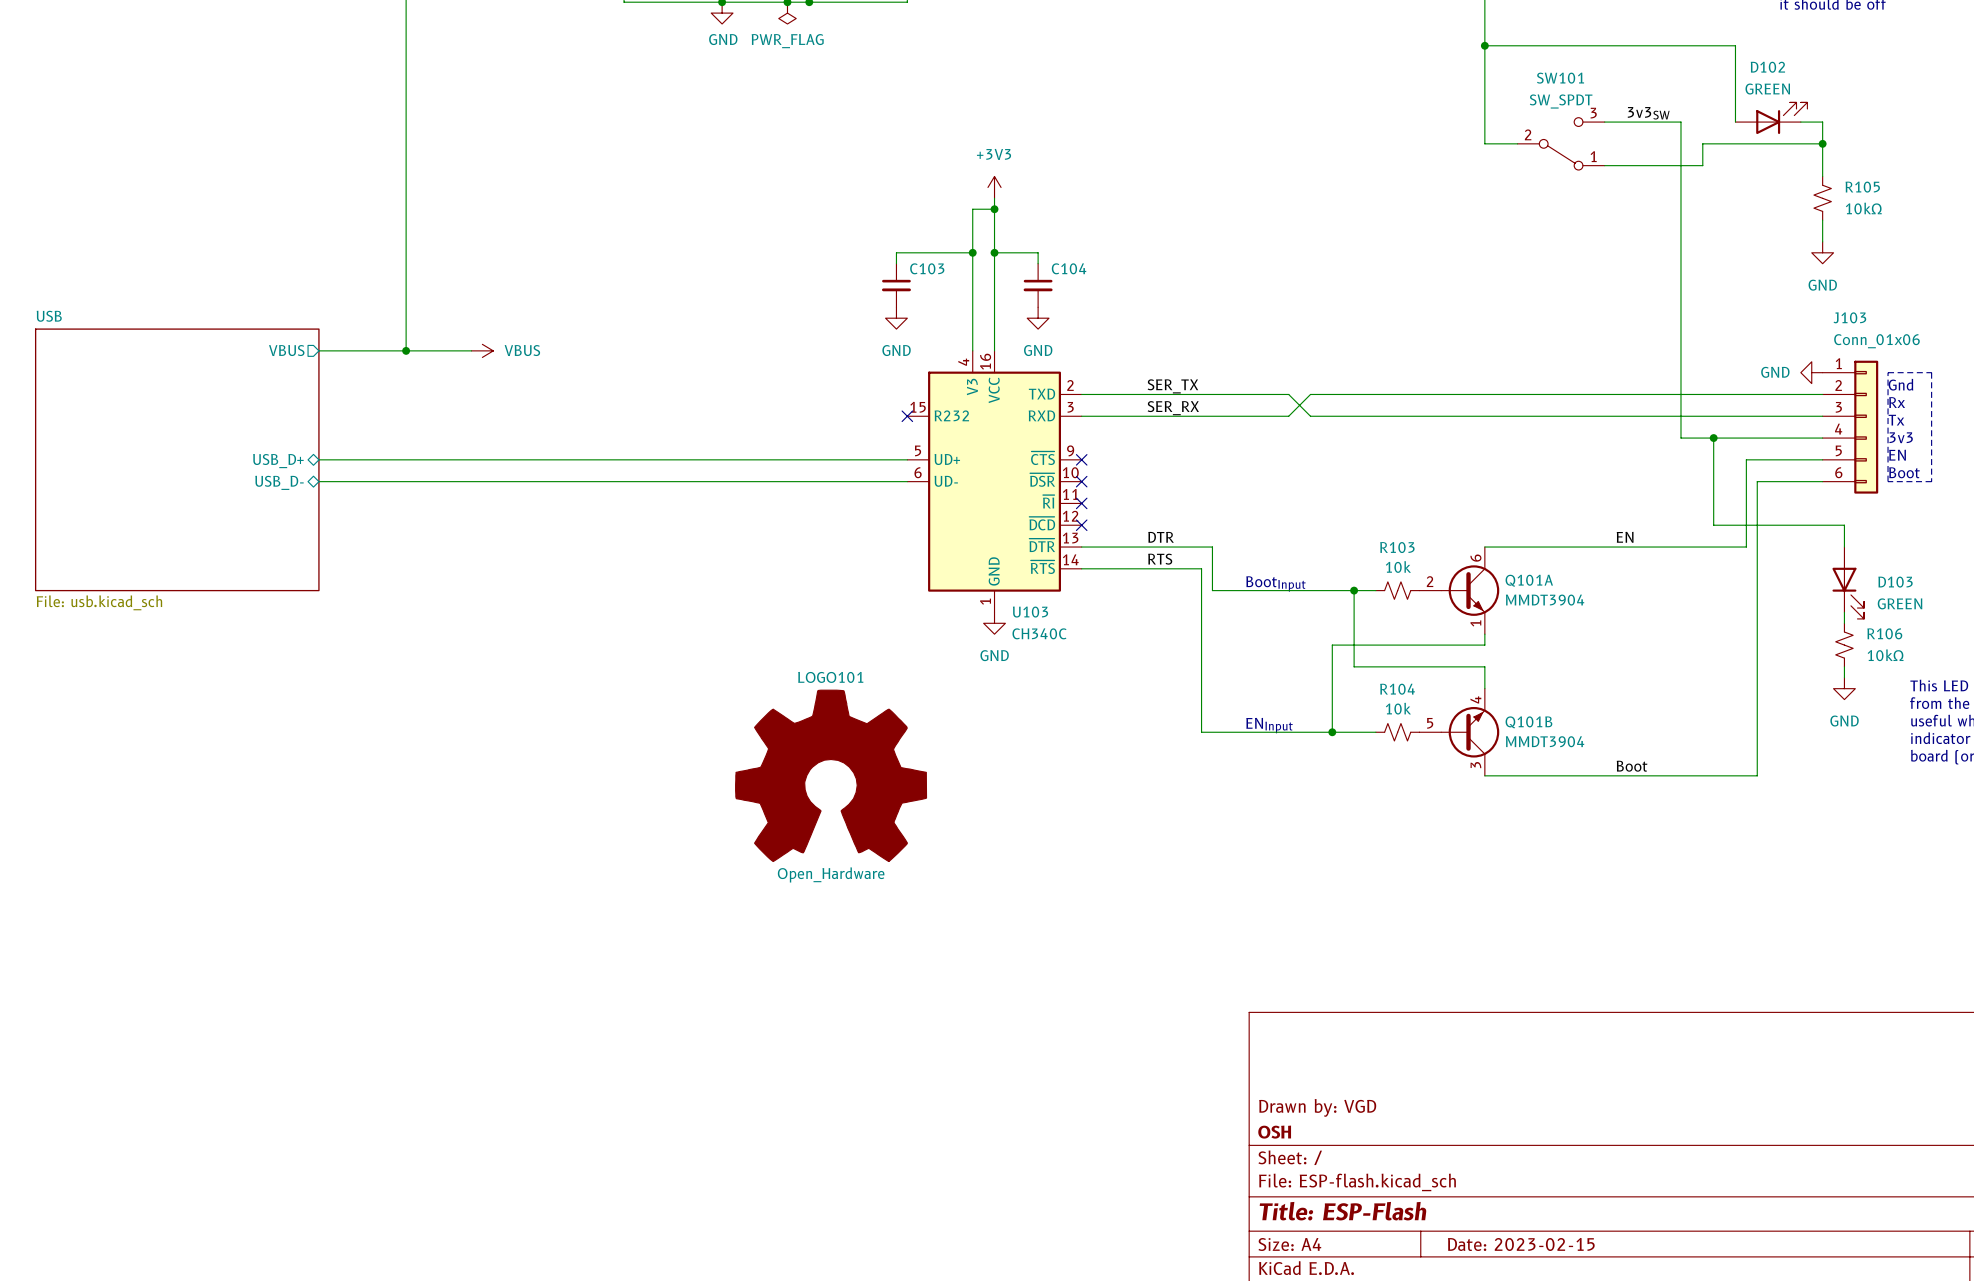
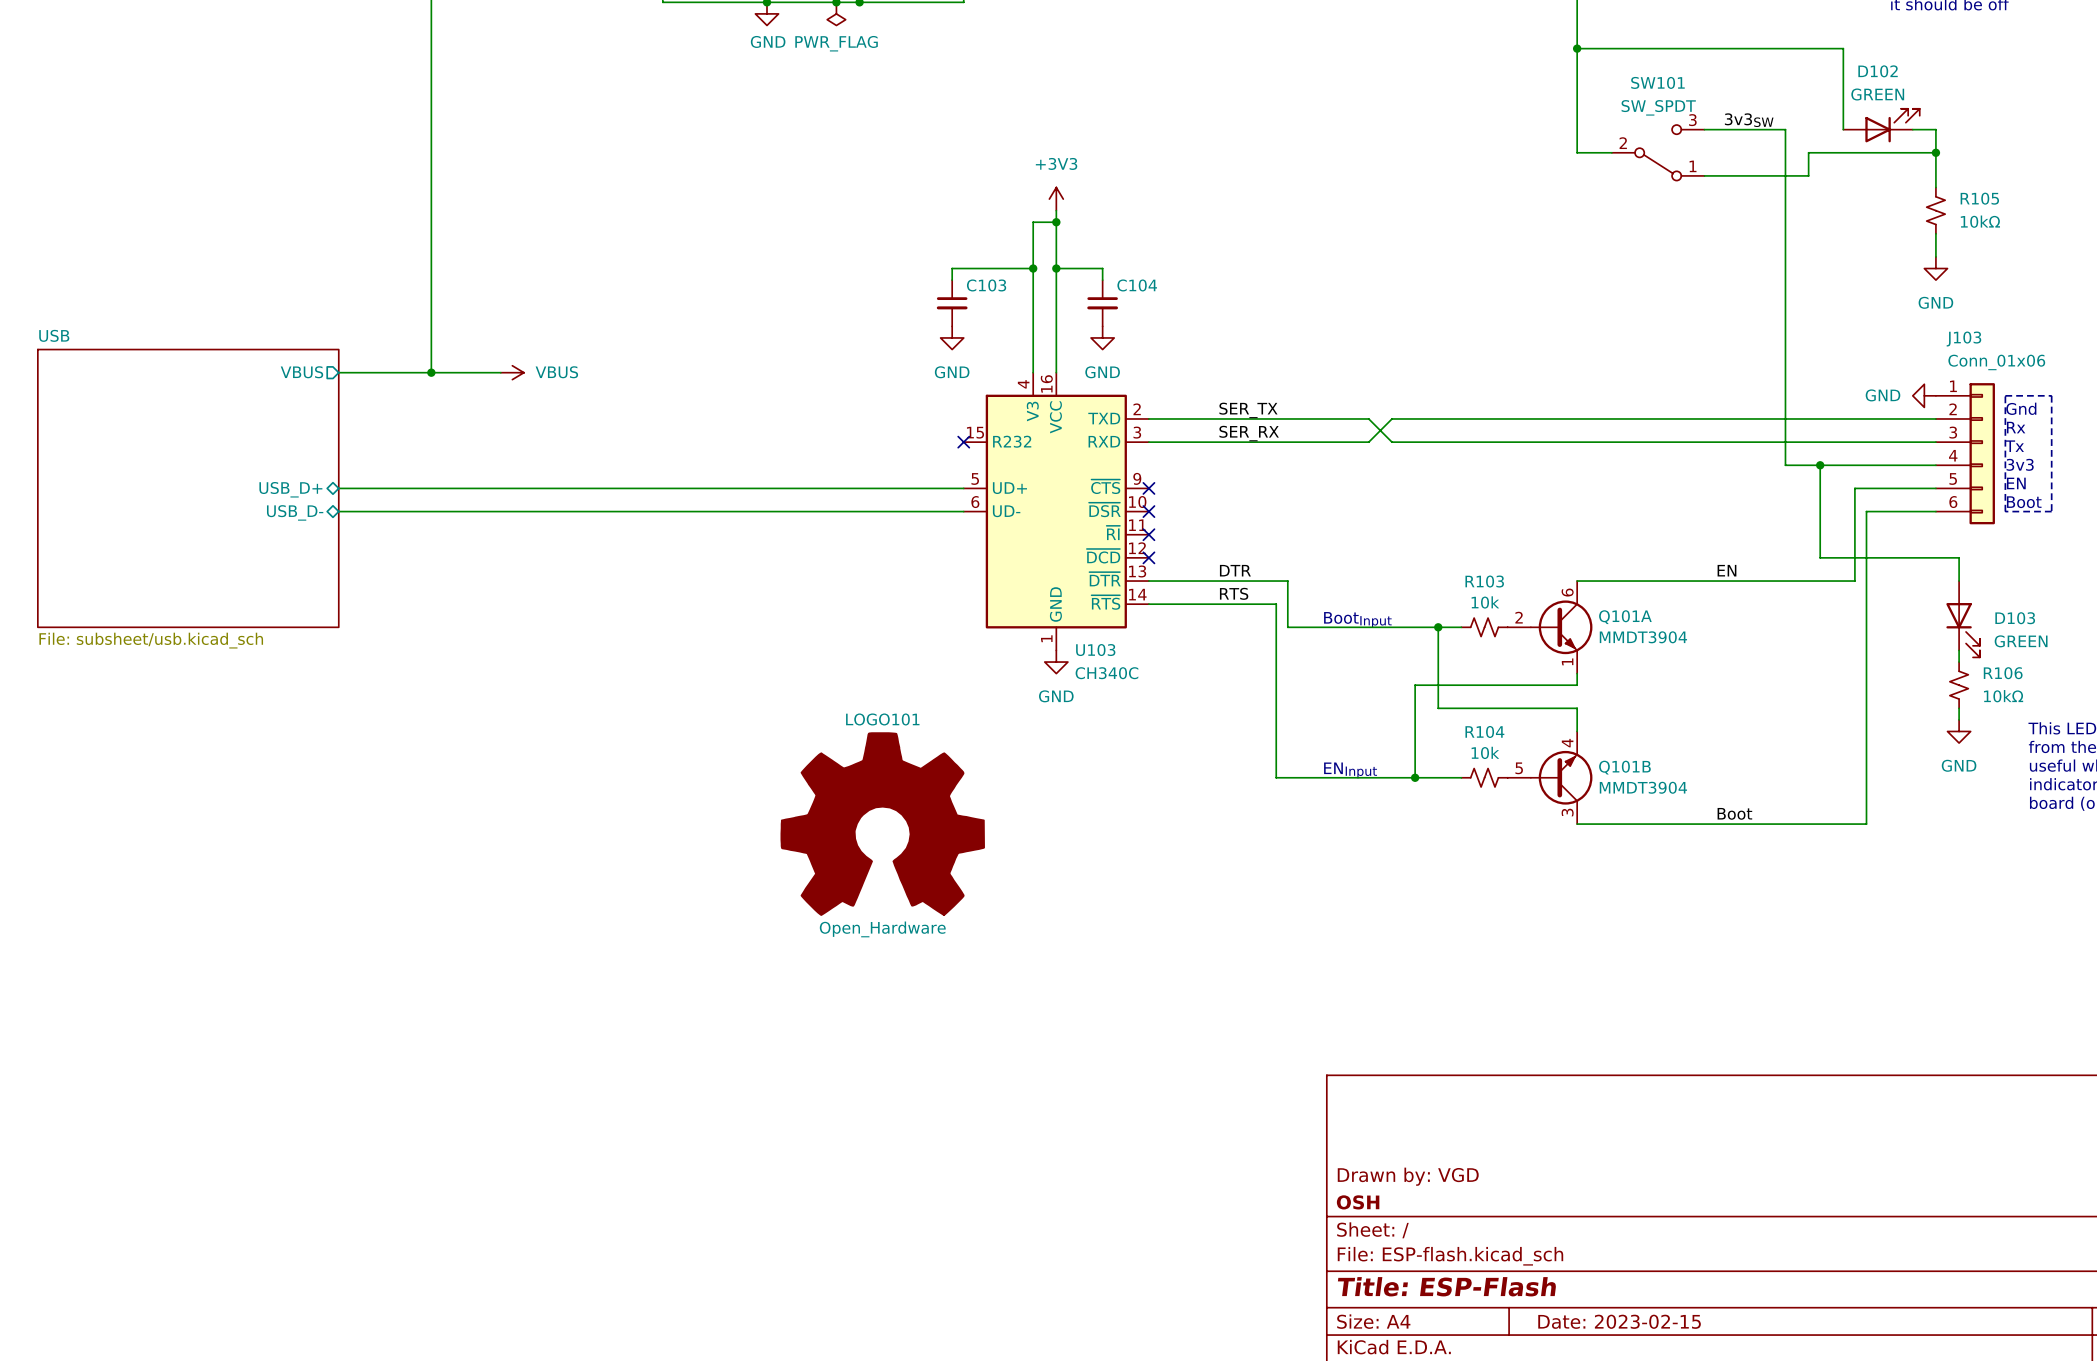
sheet USB value: File: usb.kicad_sch (99, 602) -> File: subsheet/usb.kicad_sch (151, 640)

